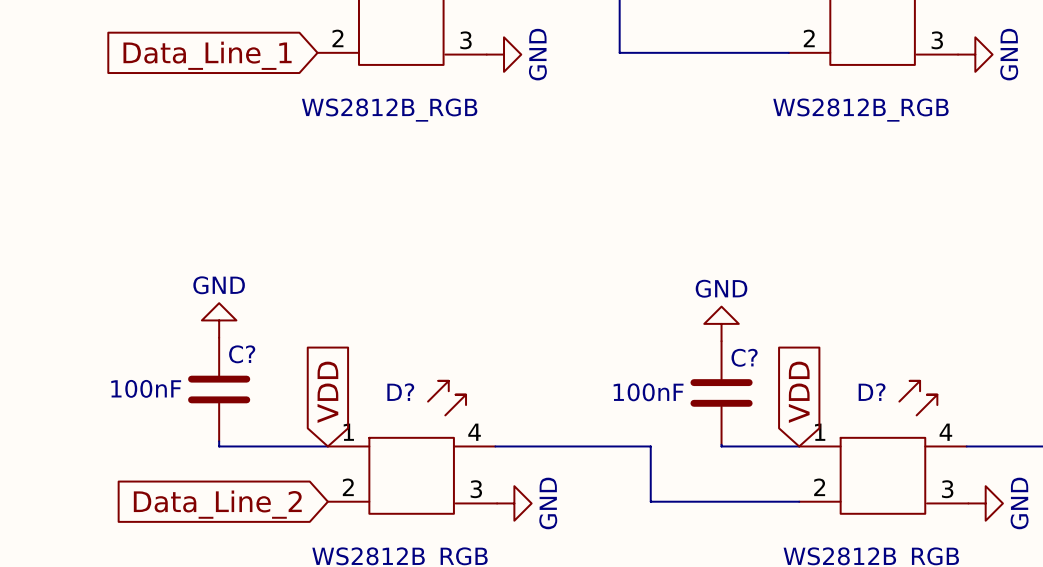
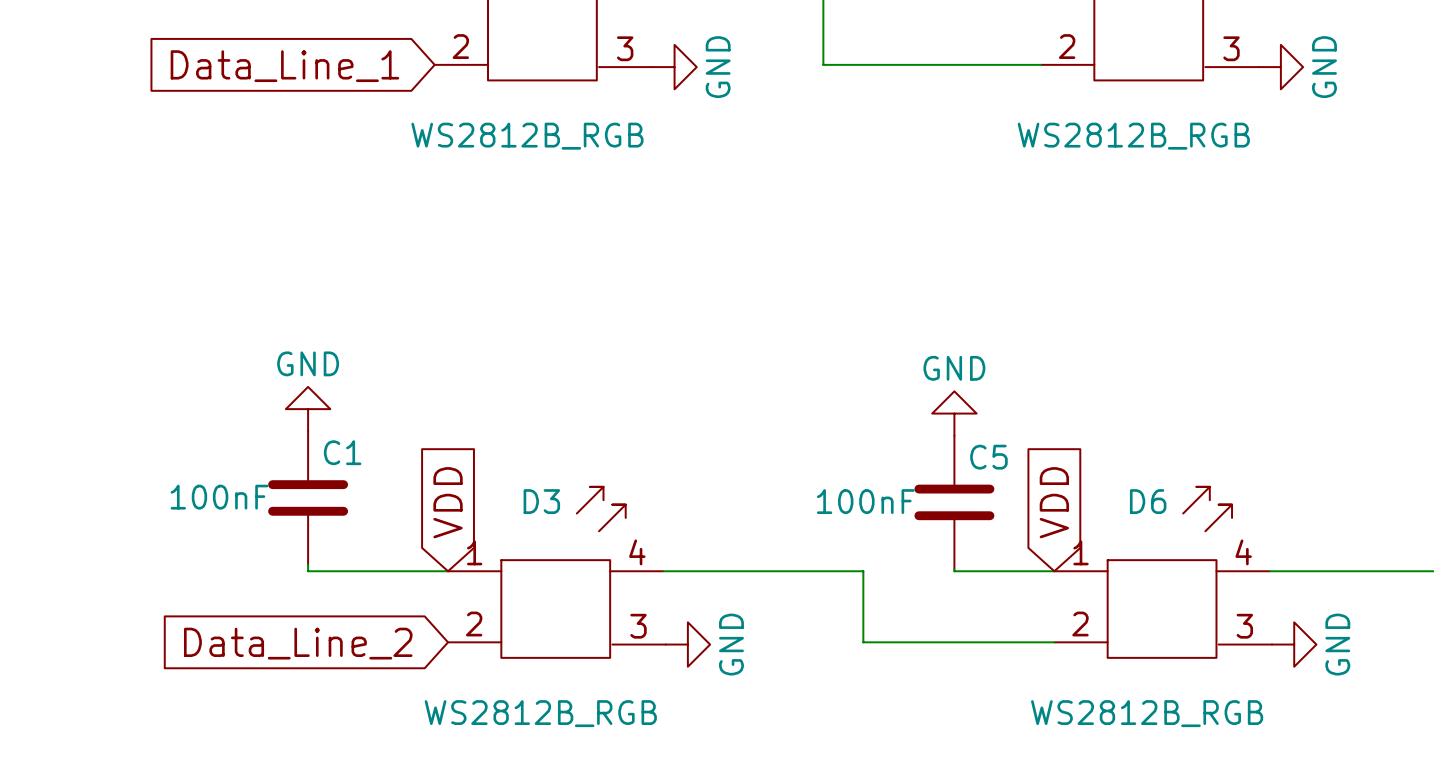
C? name: C? (242, 354) -> C1 (342, 452)
C? name: C? (744, 357) -> C5 (988, 457)
D? name: D? (400, 392) -> D3 (541, 501)
D? name: D? (872, 392) -> D6 (1148, 501)

